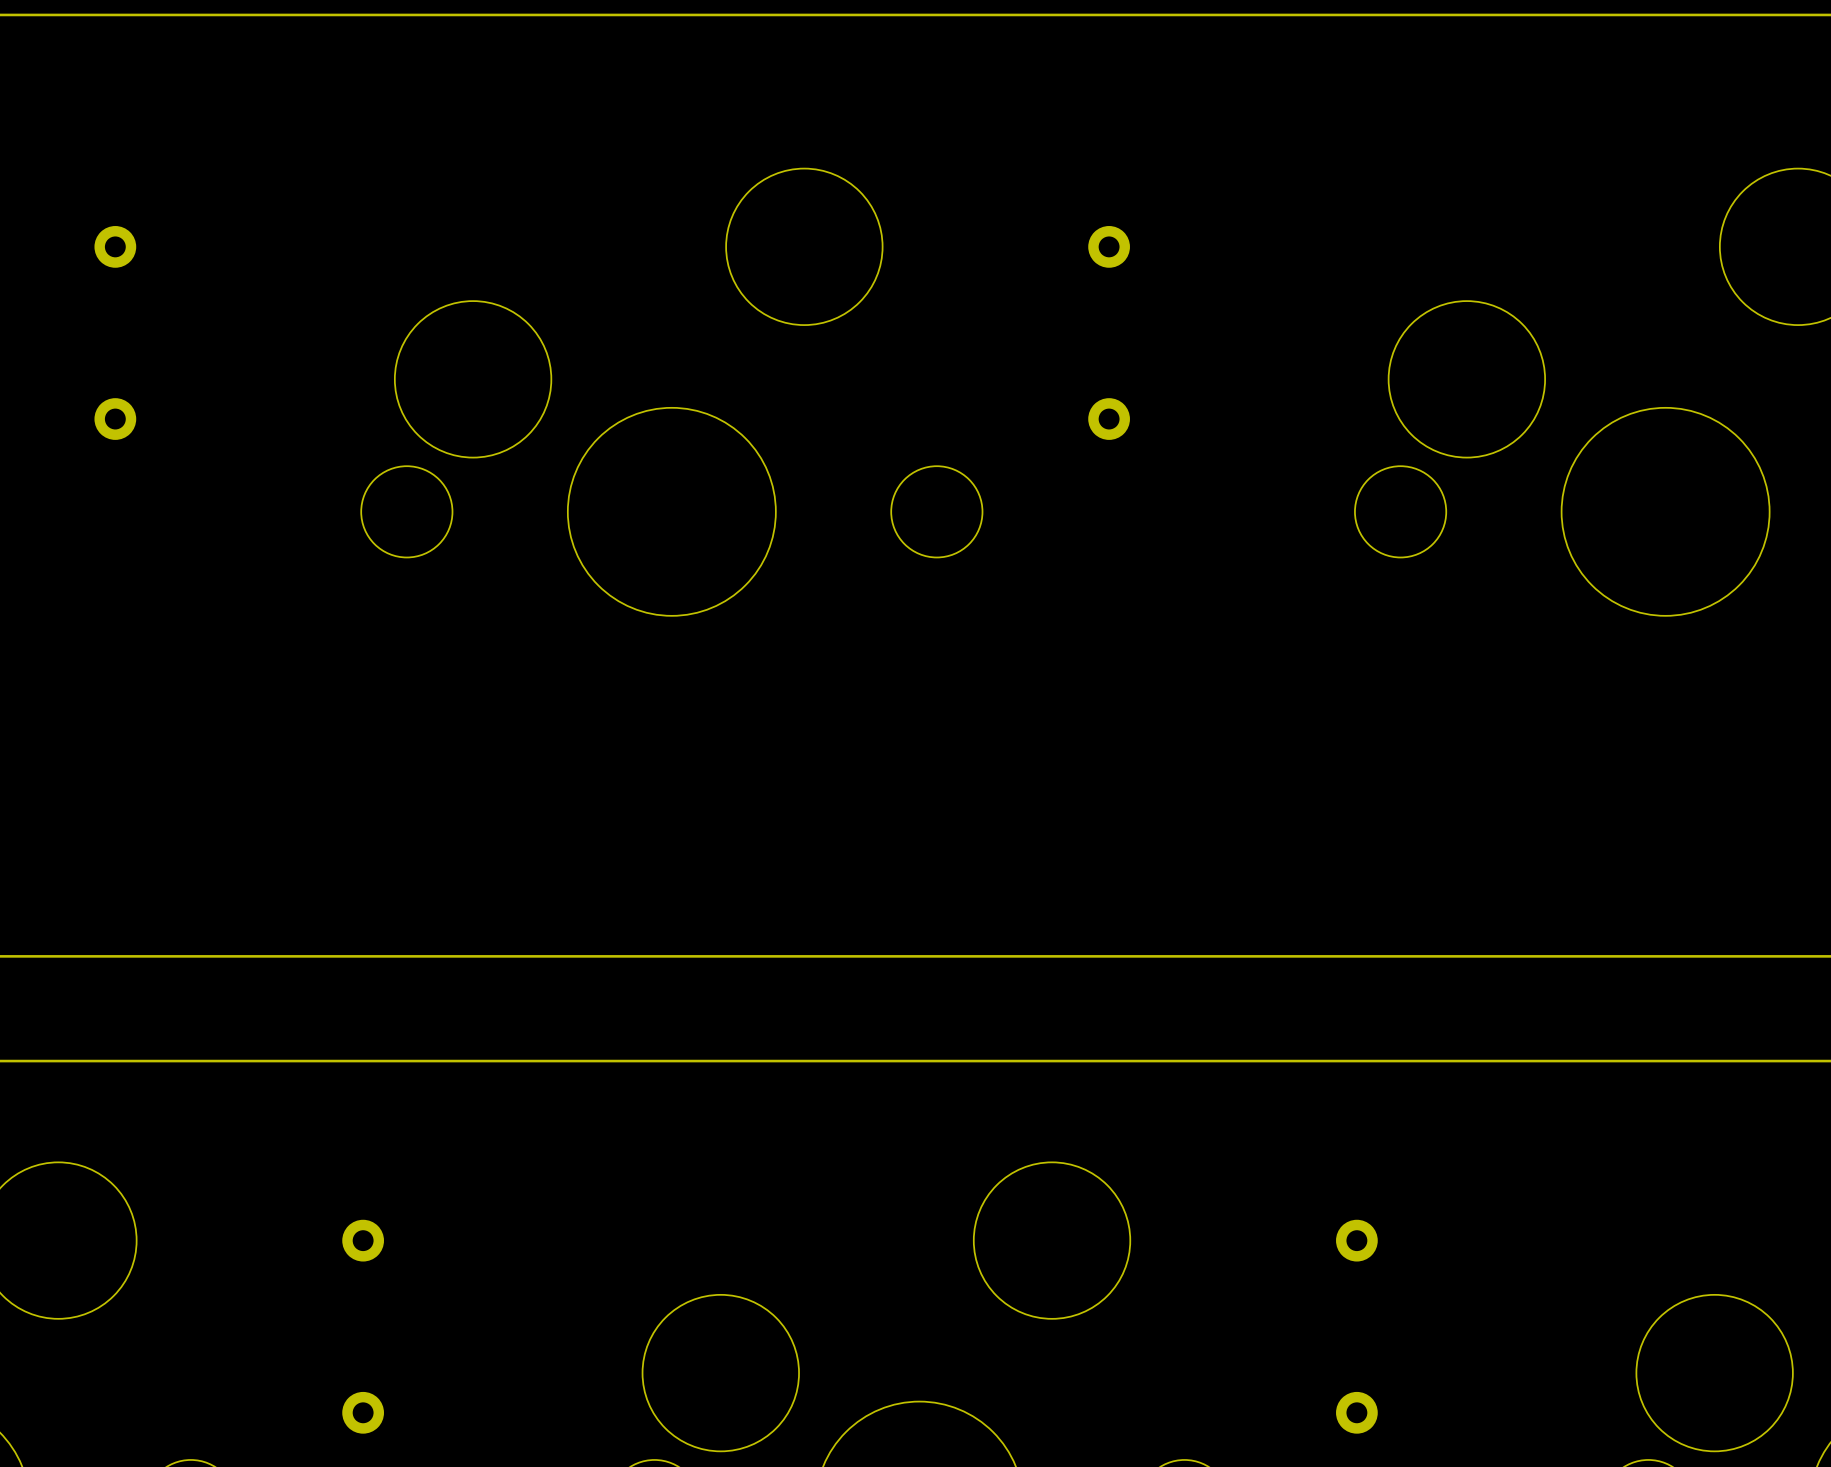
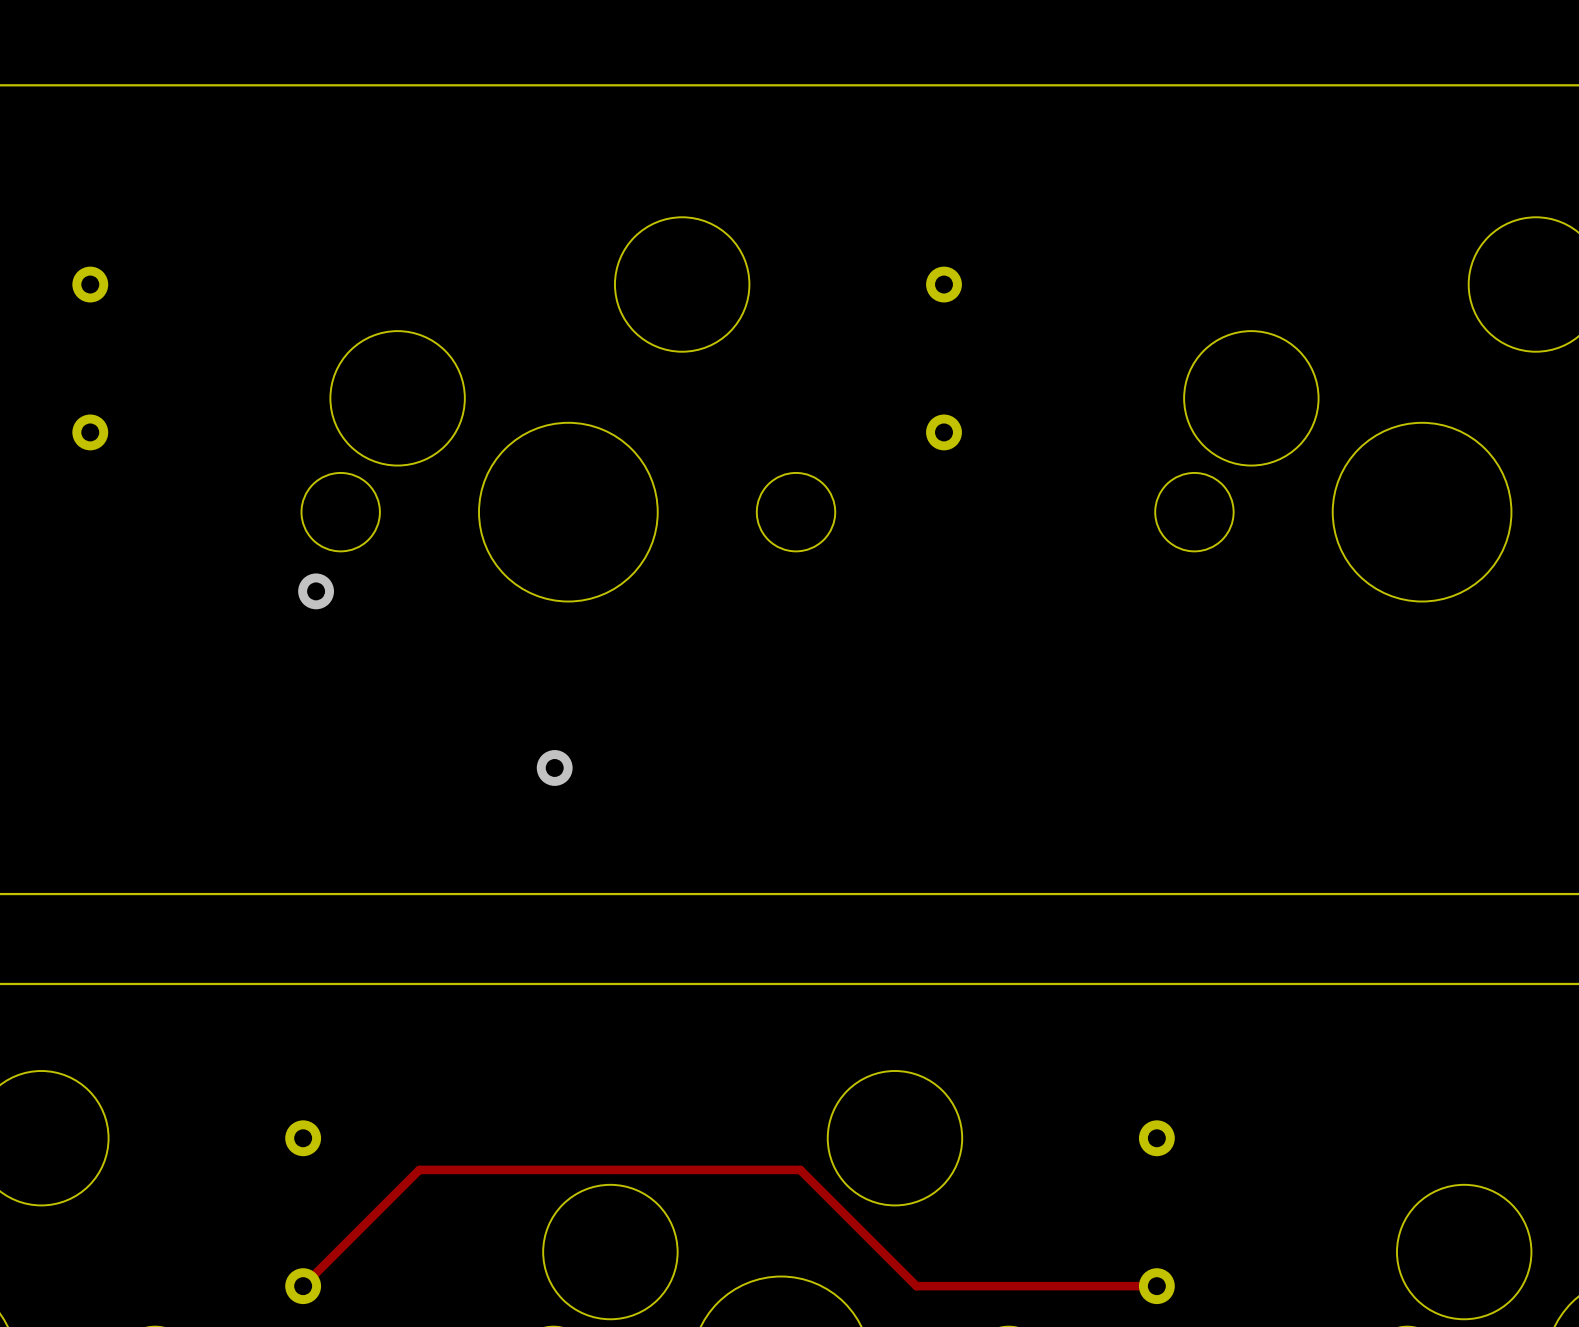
via: none -> (316, 591)
via: none -> (554, 767)
track: none -> (303, 1286) (419, 1169) (800, 1169) (916, 1286) (1156, 1286)

